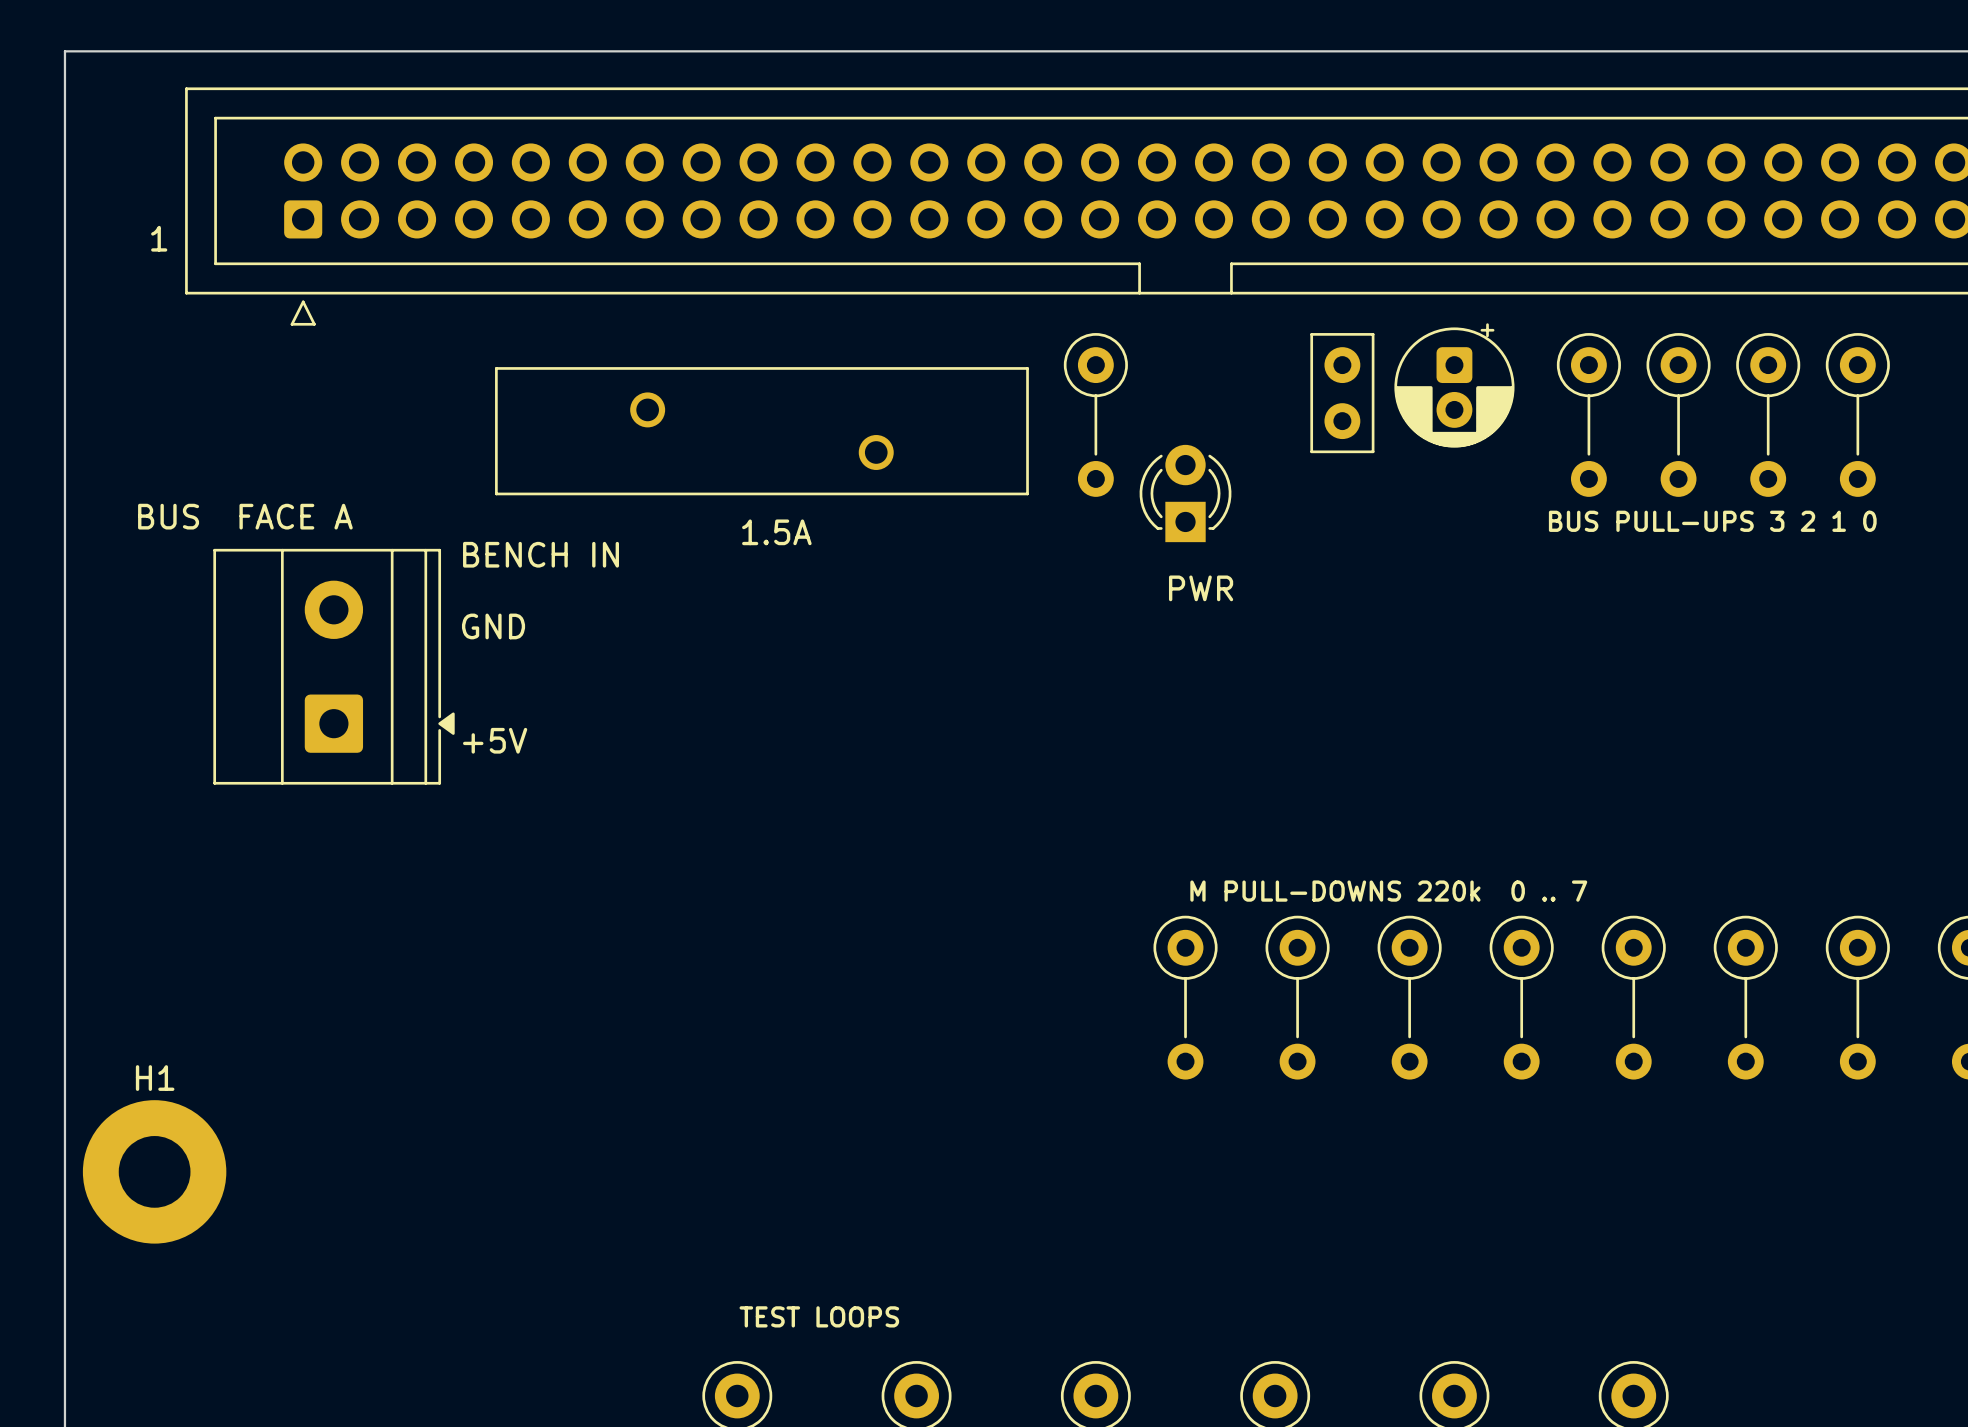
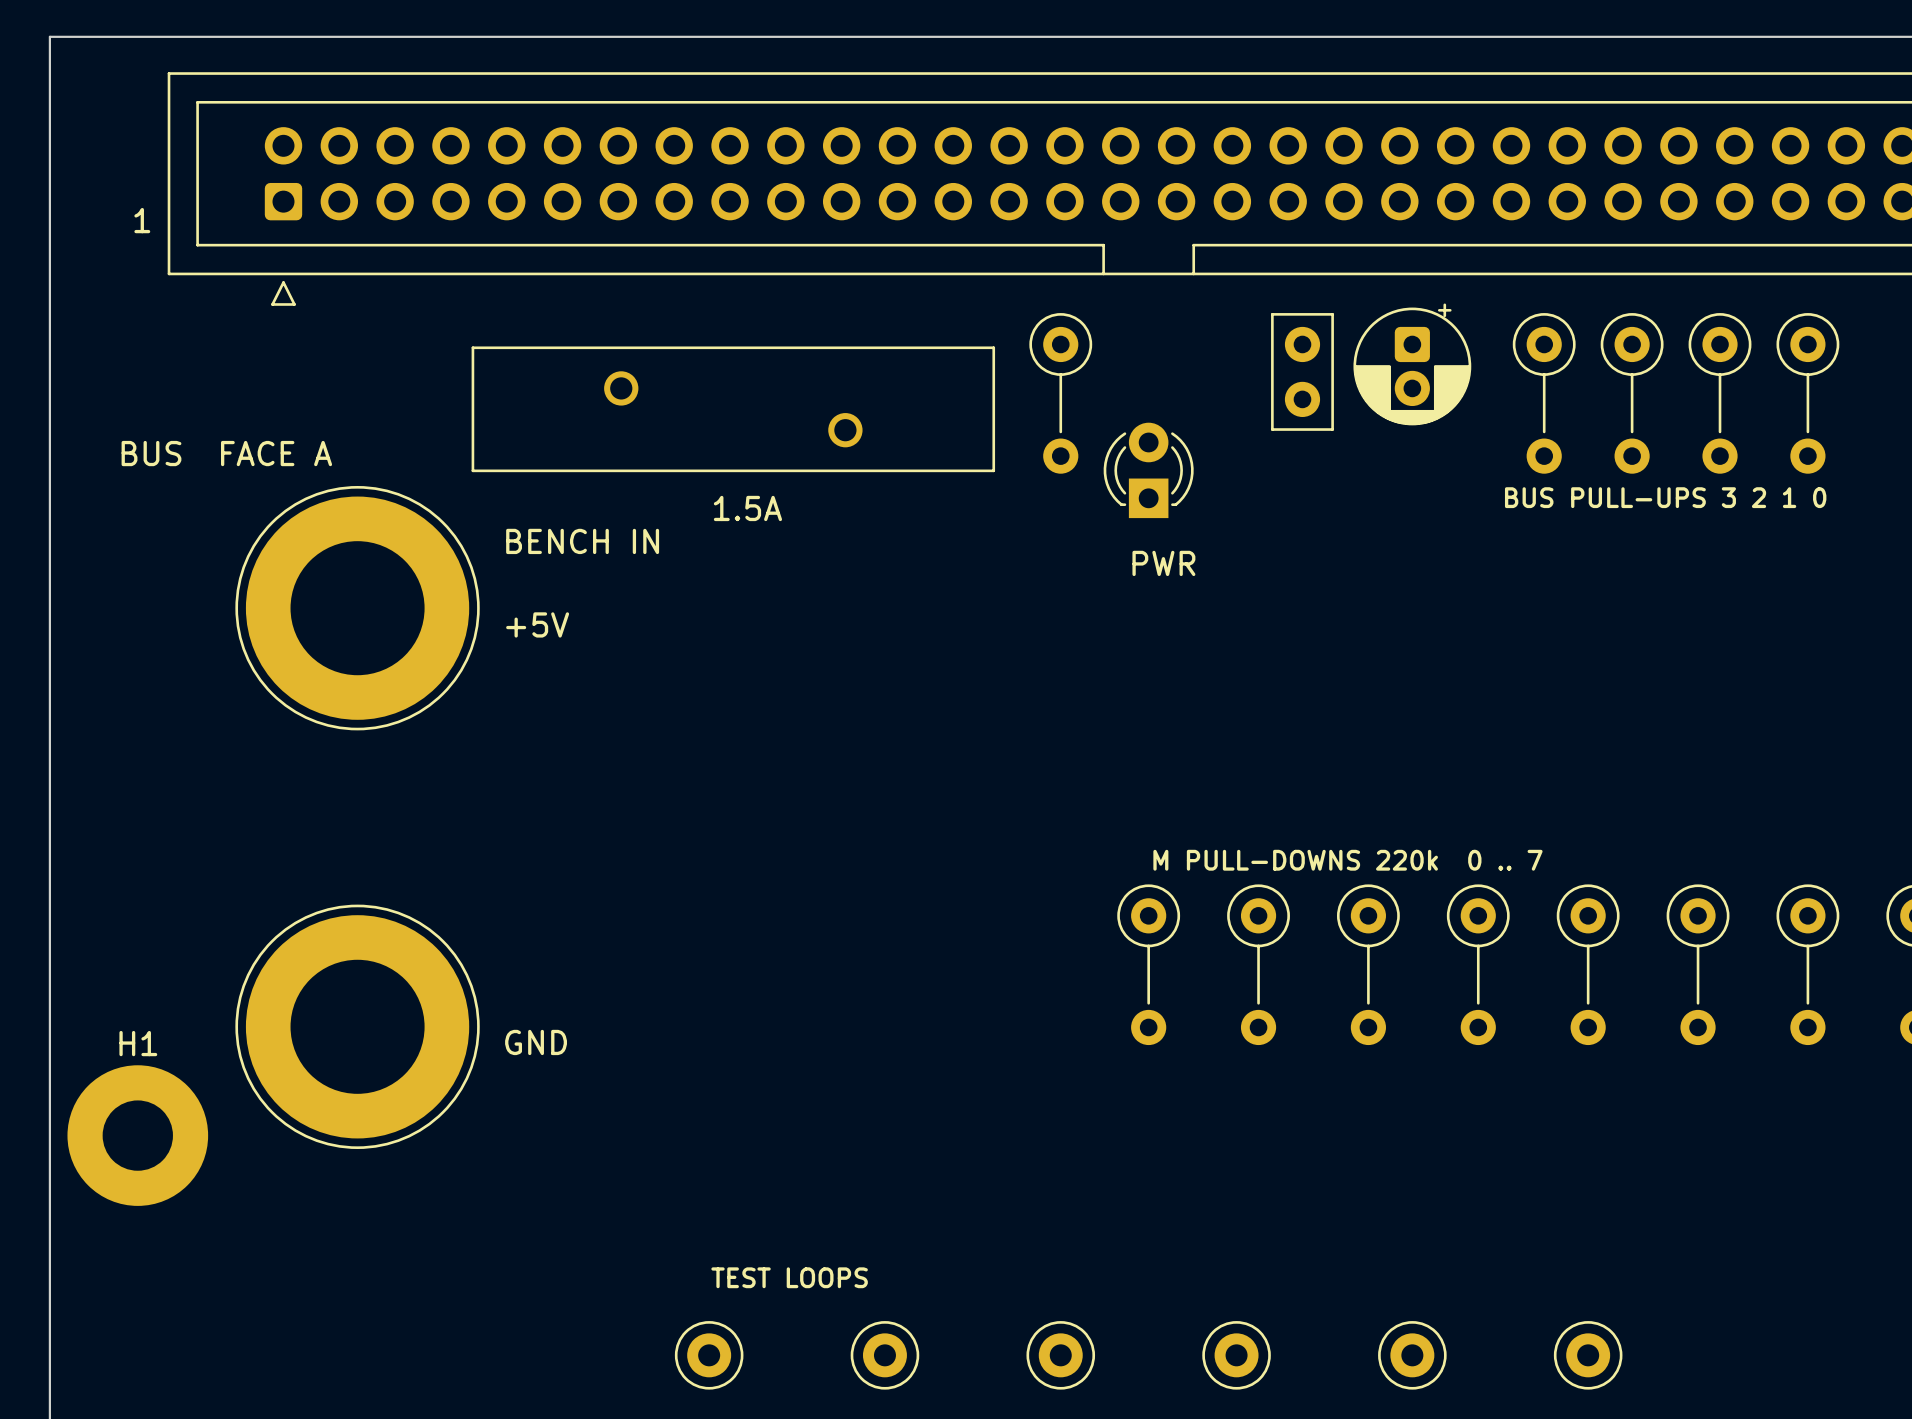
text position: BUS FACE A (245, 516) -> BUS FACE A (226, 453)
text position: BENCH IN (541, 554) -> BENCH IN (582, 541)
text position: GND (493, 626) -> GND (536, 1042)
part: none -> (357, 608)
part: (334, 666) -> none
text position: +5V (495, 740) -> +5V (537, 624)
part: none -> (357, 1026)

